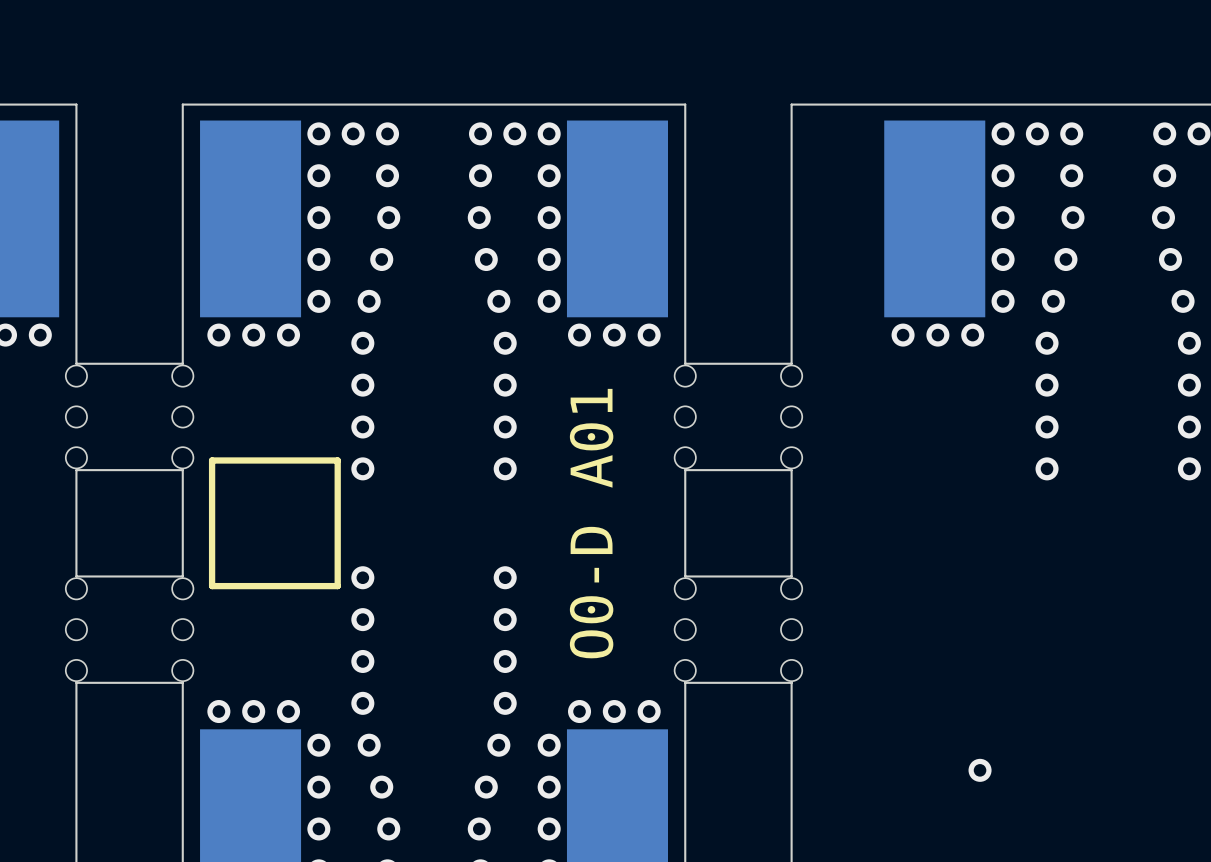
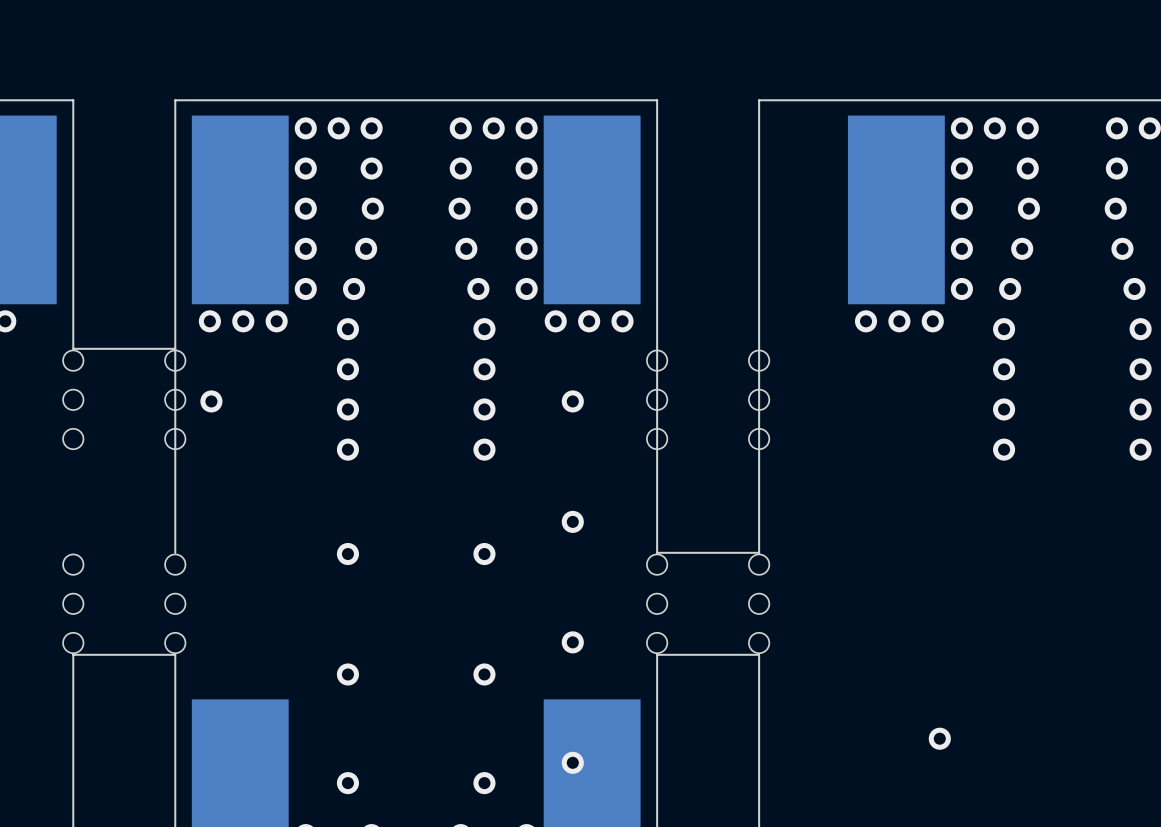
via: (40, 335) -> none
board edge: (791, 363) (685, 363) -> (759, 348) (759, 450)
via: none -> (211, 401)
via: none -> (572, 401)
line: (337, 460) (337, 586) (212, 586) (212, 460) (337, 460) -> none
board edge: (182, 470) (76, 470) (76, 576) (182, 576) -> (175, 450) (175, 348)
board edge: (791, 470) (685, 470) -> (657, 348) (657, 450)
text: O0-D A01 (591, 523) -> none
via: none -> (572, 521)
via: (362, 619) -> none
via: (505, 619) -> none
via: (362, 661) -> none
via: (505, 661) -> none
via: none -> (572, 642)
via: (218, 711) -> none
via: (253, 711) -> none
via: (288, 711) -> none
via: (579, 711) -> none
via: (614, 711) -> none
via: (649, 711) -> none
via: (318, 745) -> none
via: (369, 745) -> none
via: (498, 745) -> none
via: (549, 745) -> none
via: (318, 787) -> none
via: (381, 787) -> none
via: (486, 787) -> none
via: (549, 787) -> none
via: none -> (572, 762)
via: none -> (347, 783)
via: none -> (484, 783)
via: (318, 828) -> none
via: (388, 828) -> none
via: (479, 828) -> none
via: (549, 828) -> none

